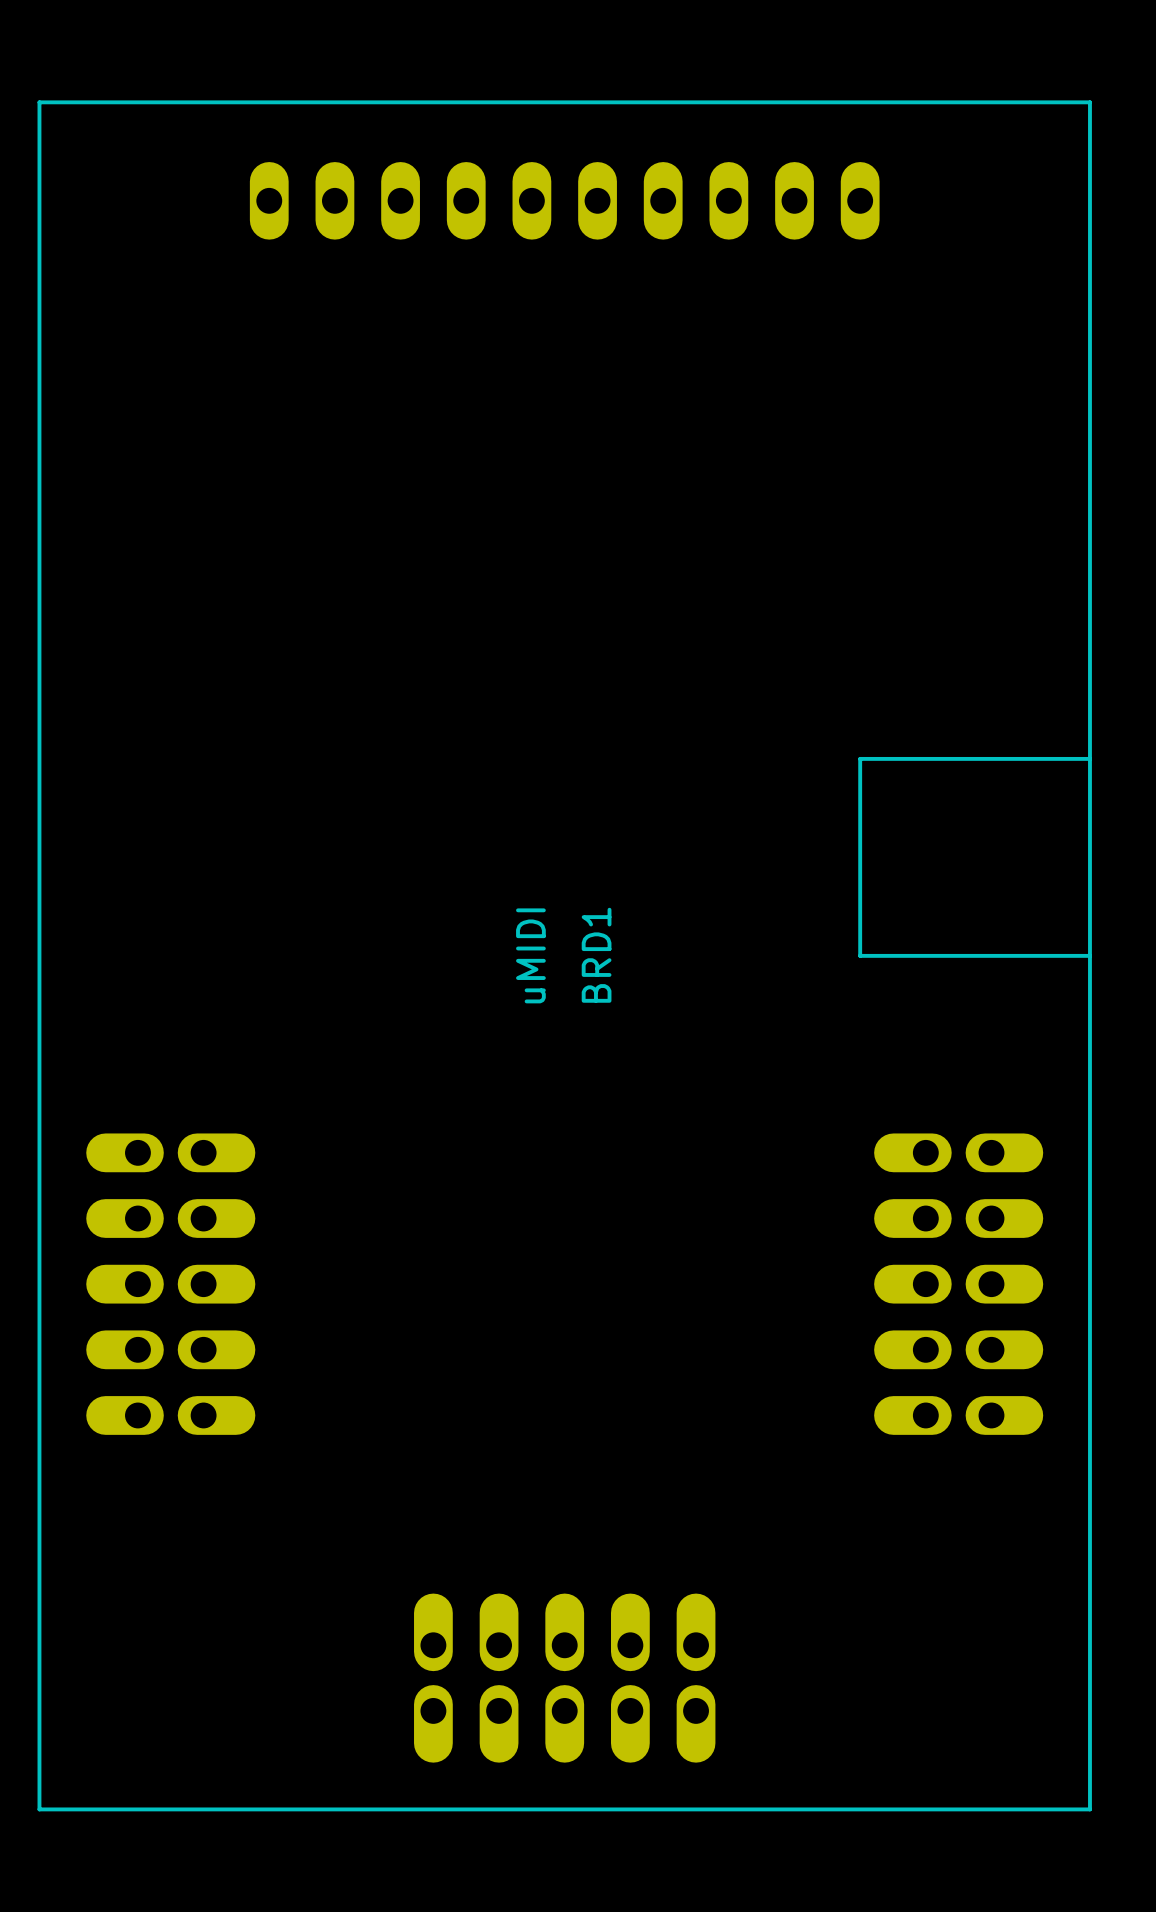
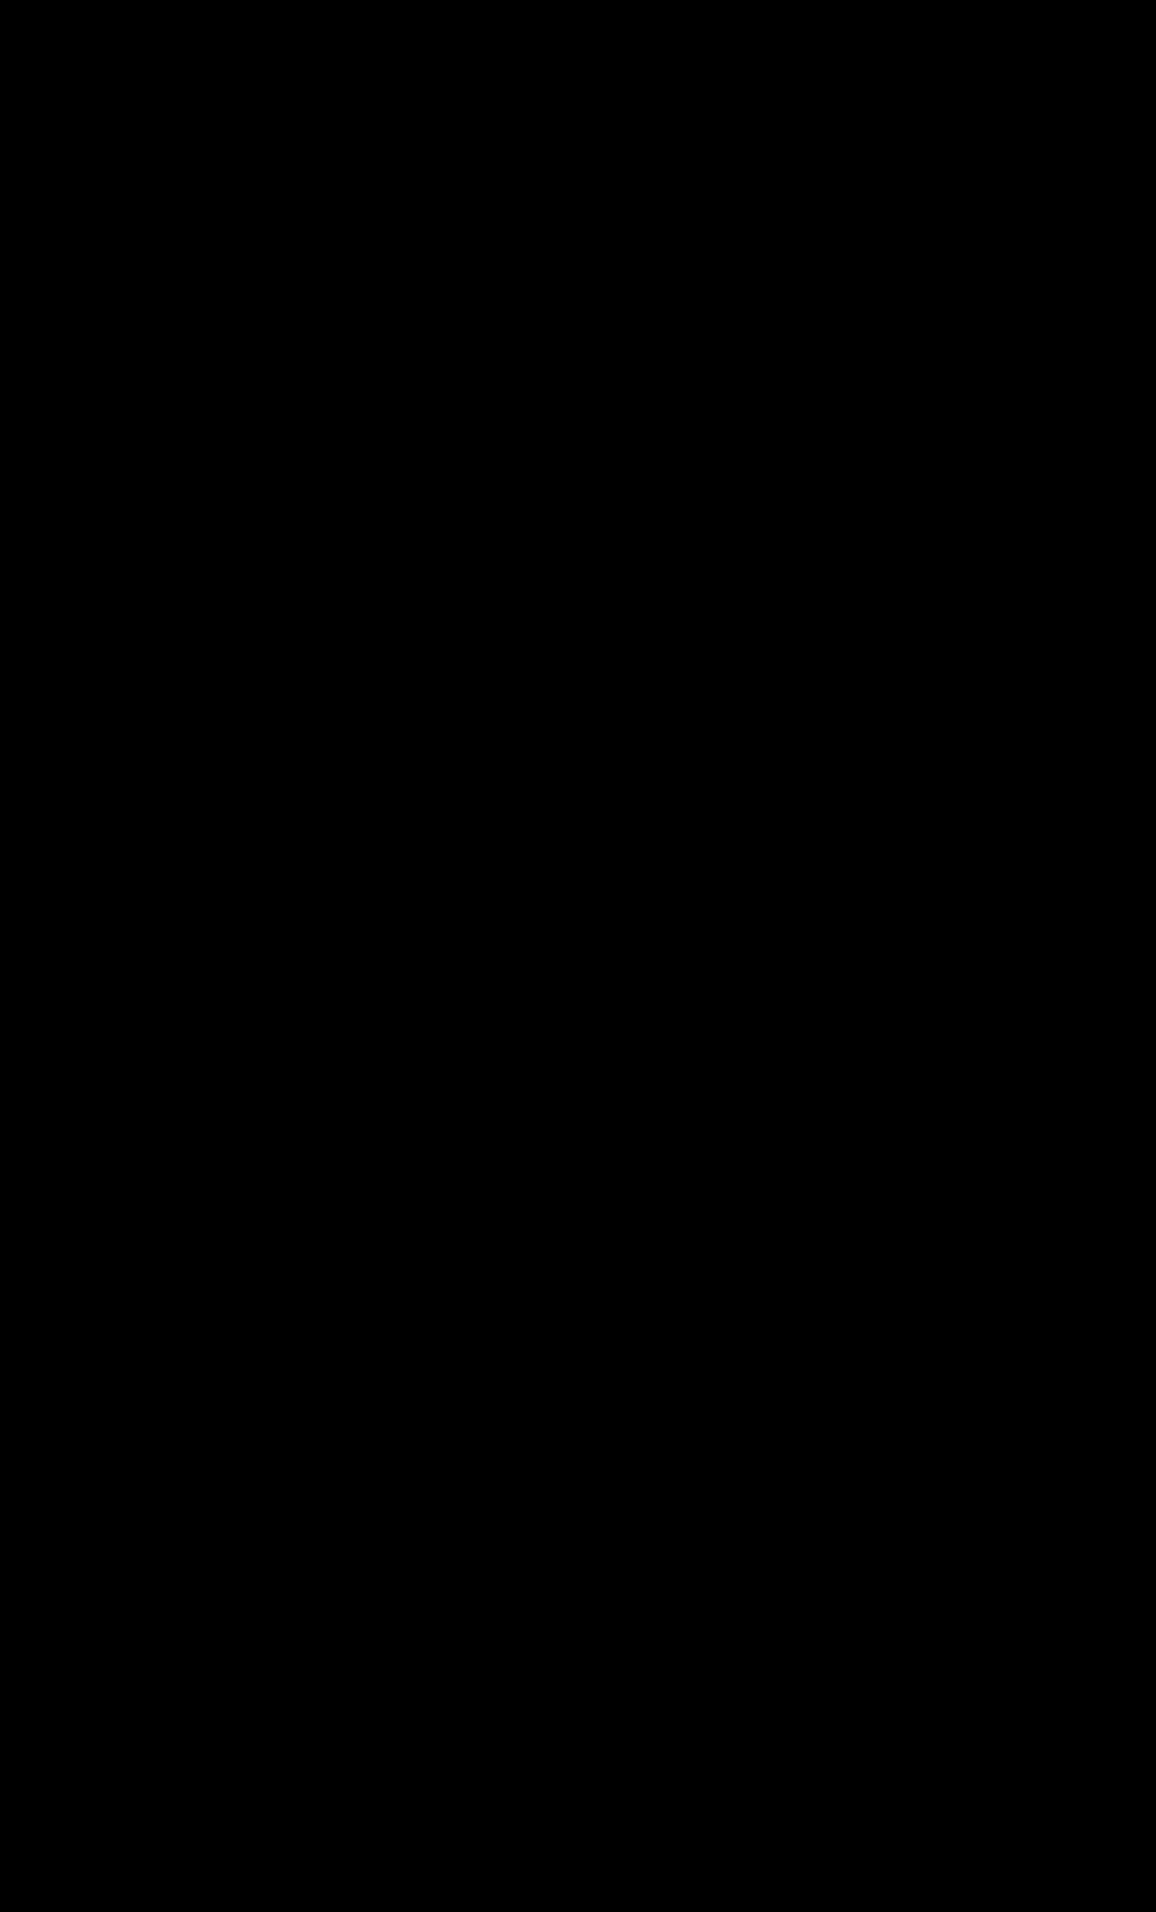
BRD1: uMIDI (564, 955) -> none

